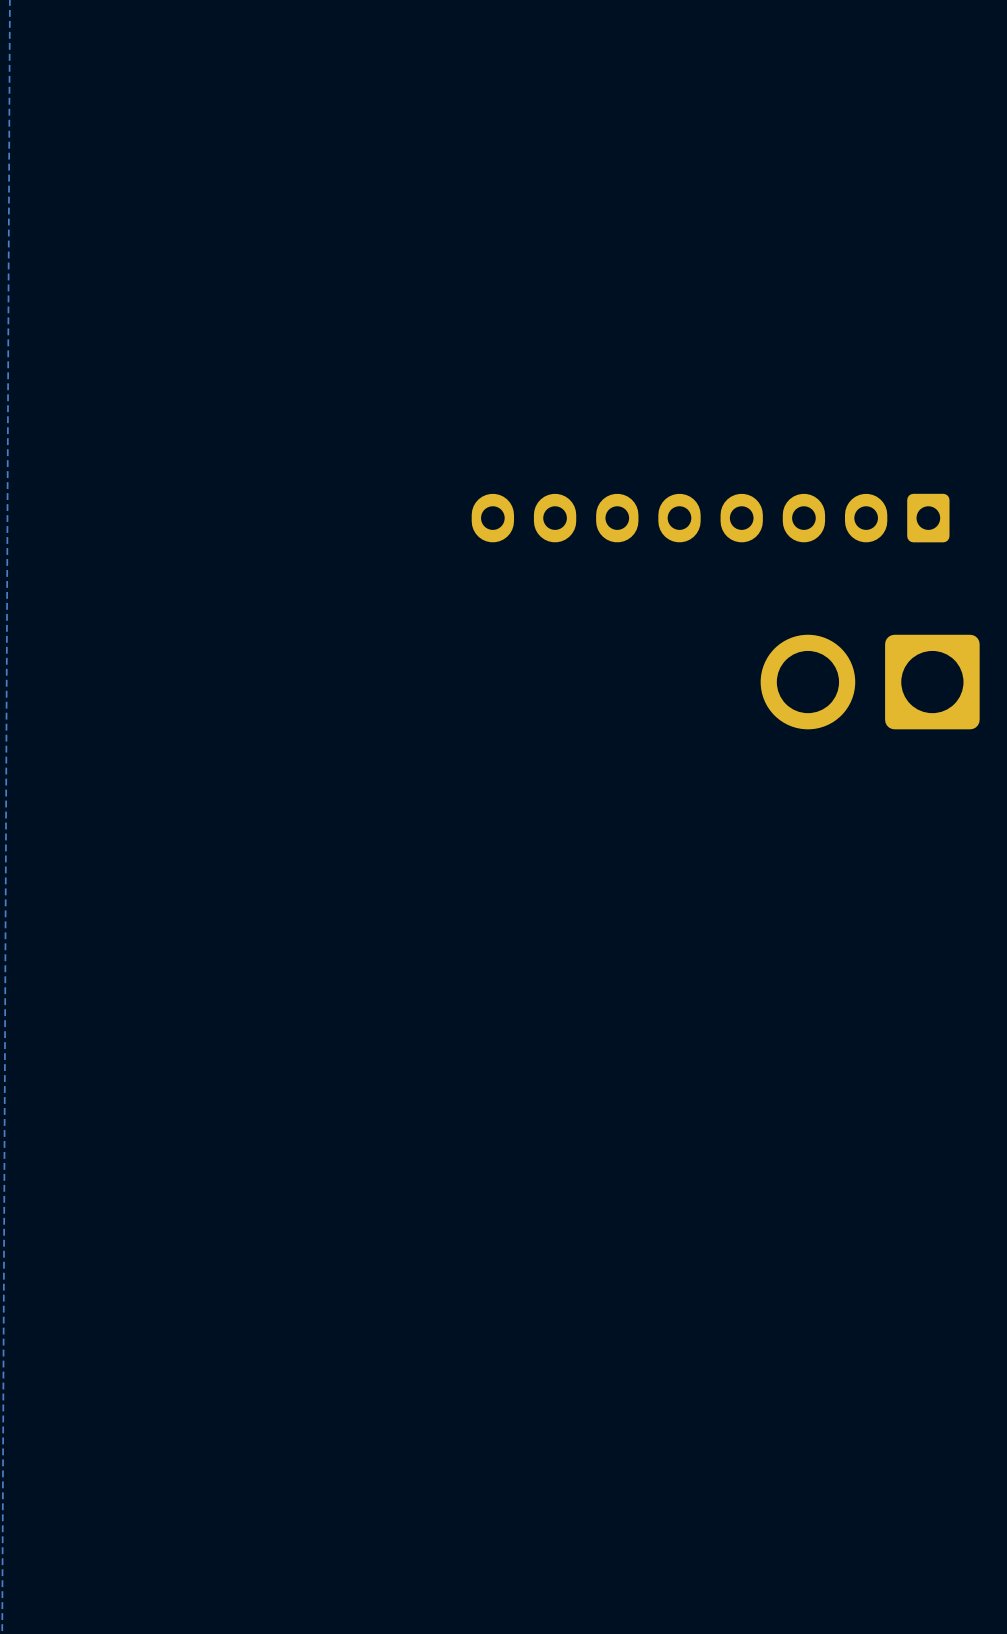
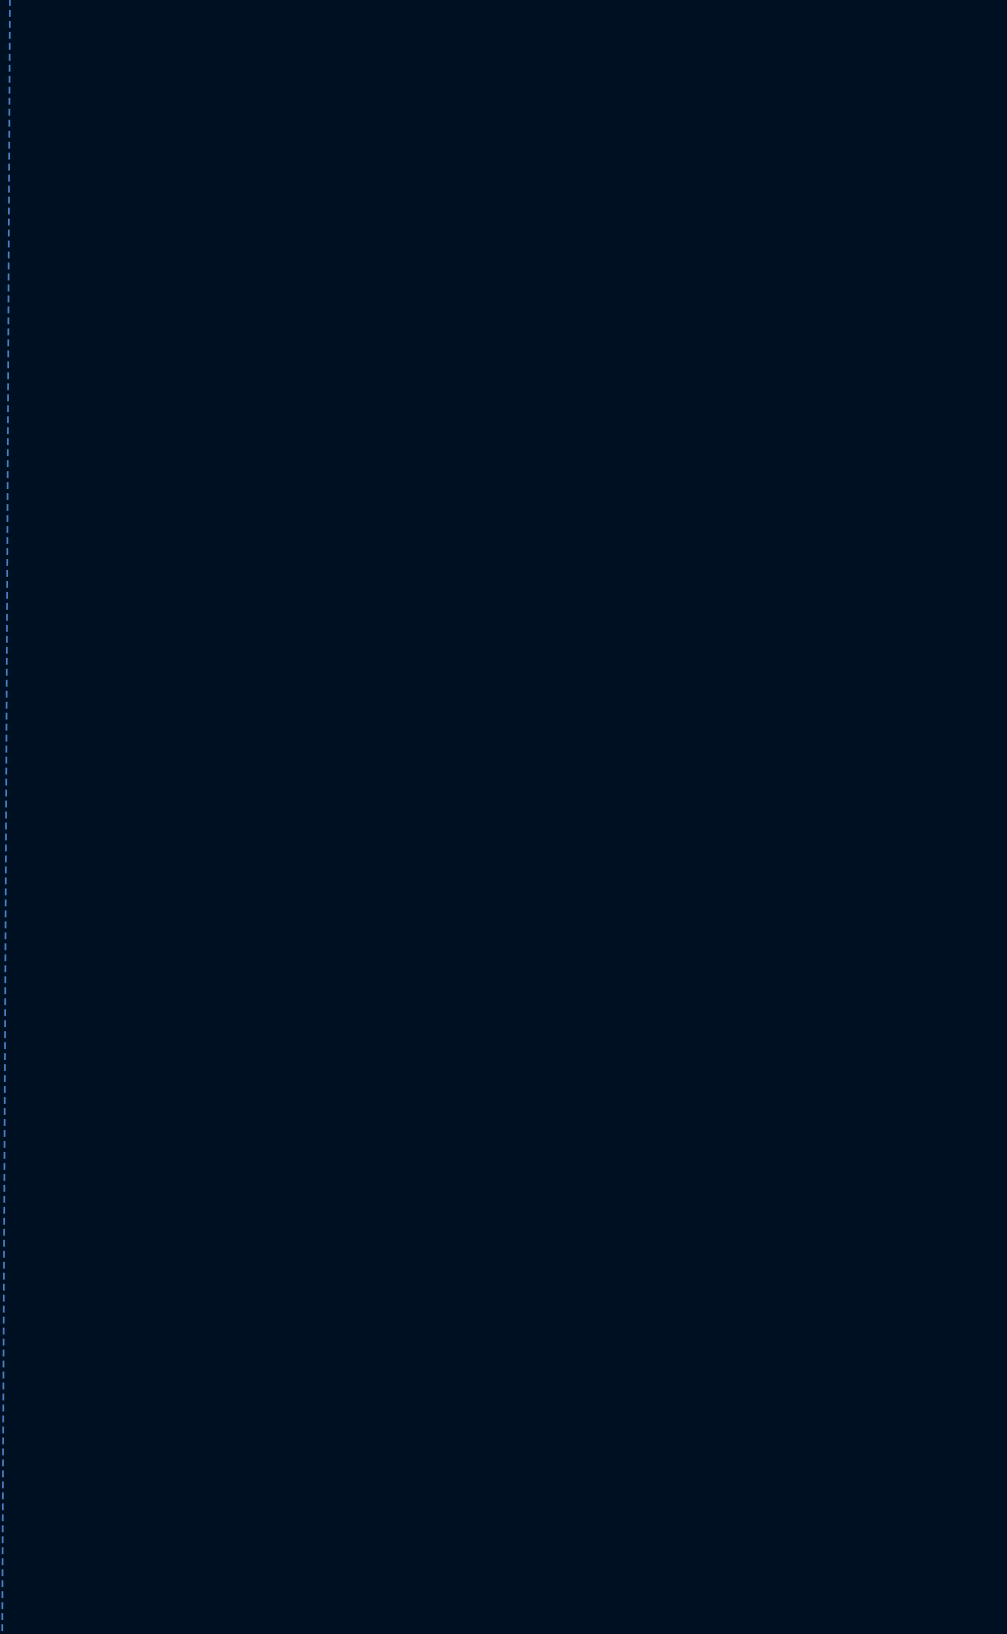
part: (710, 518) -> none
part: (870, 682) -> none

